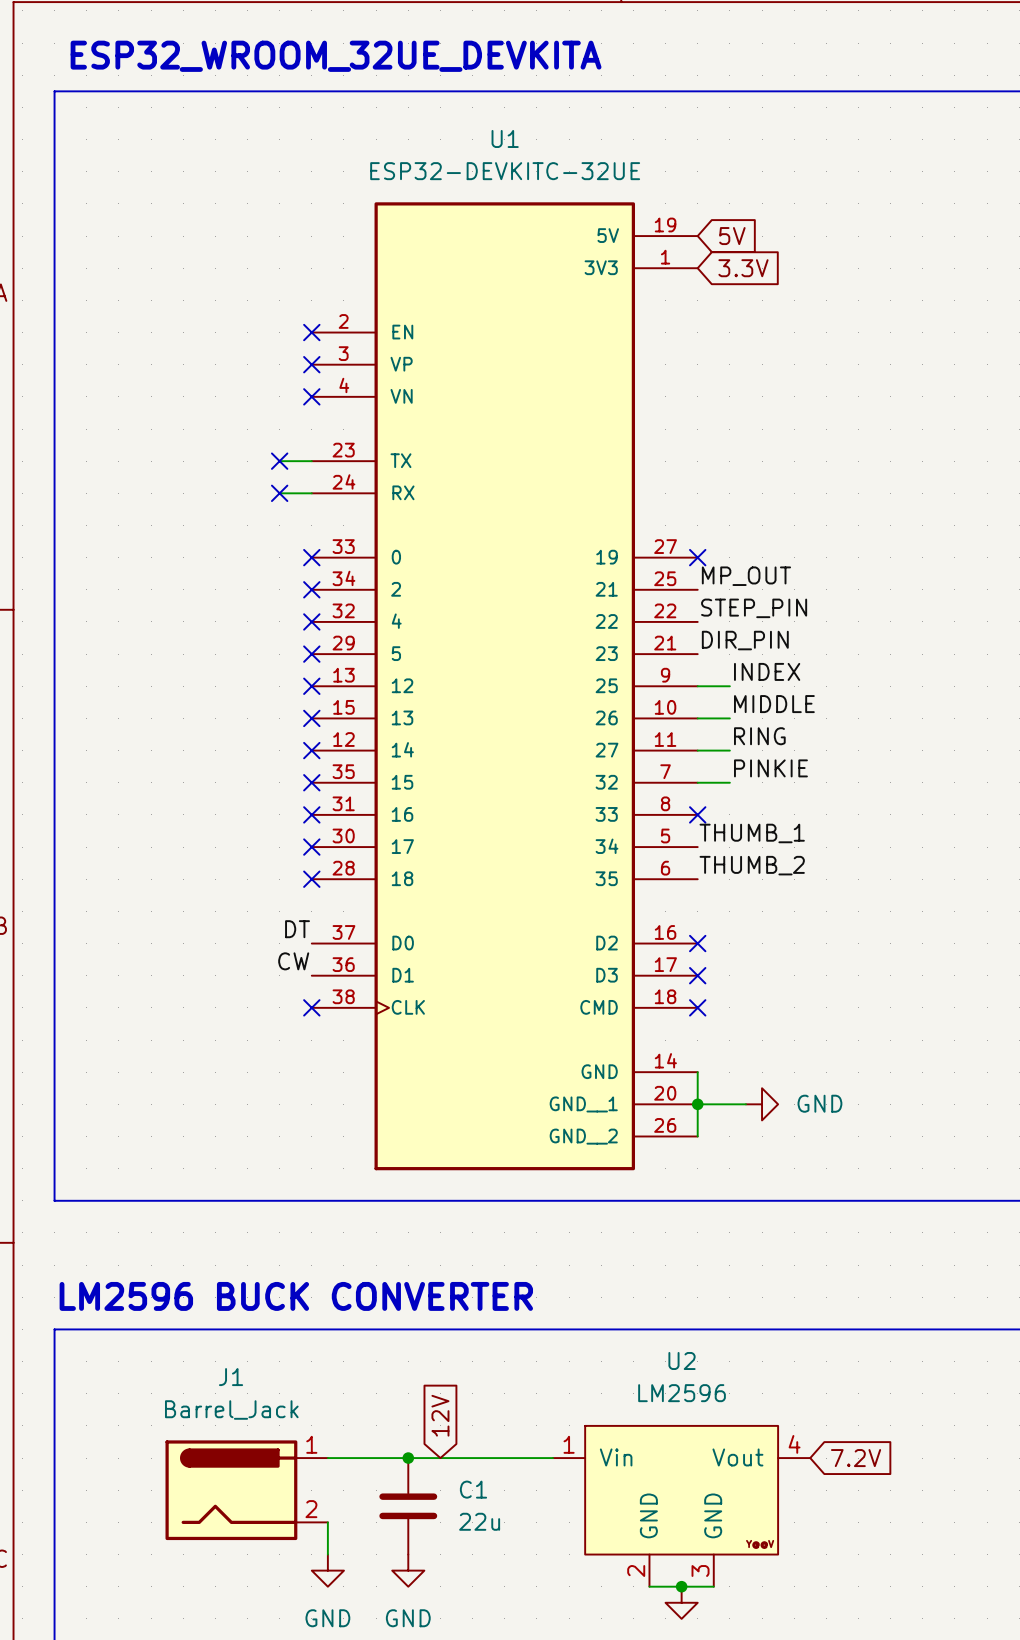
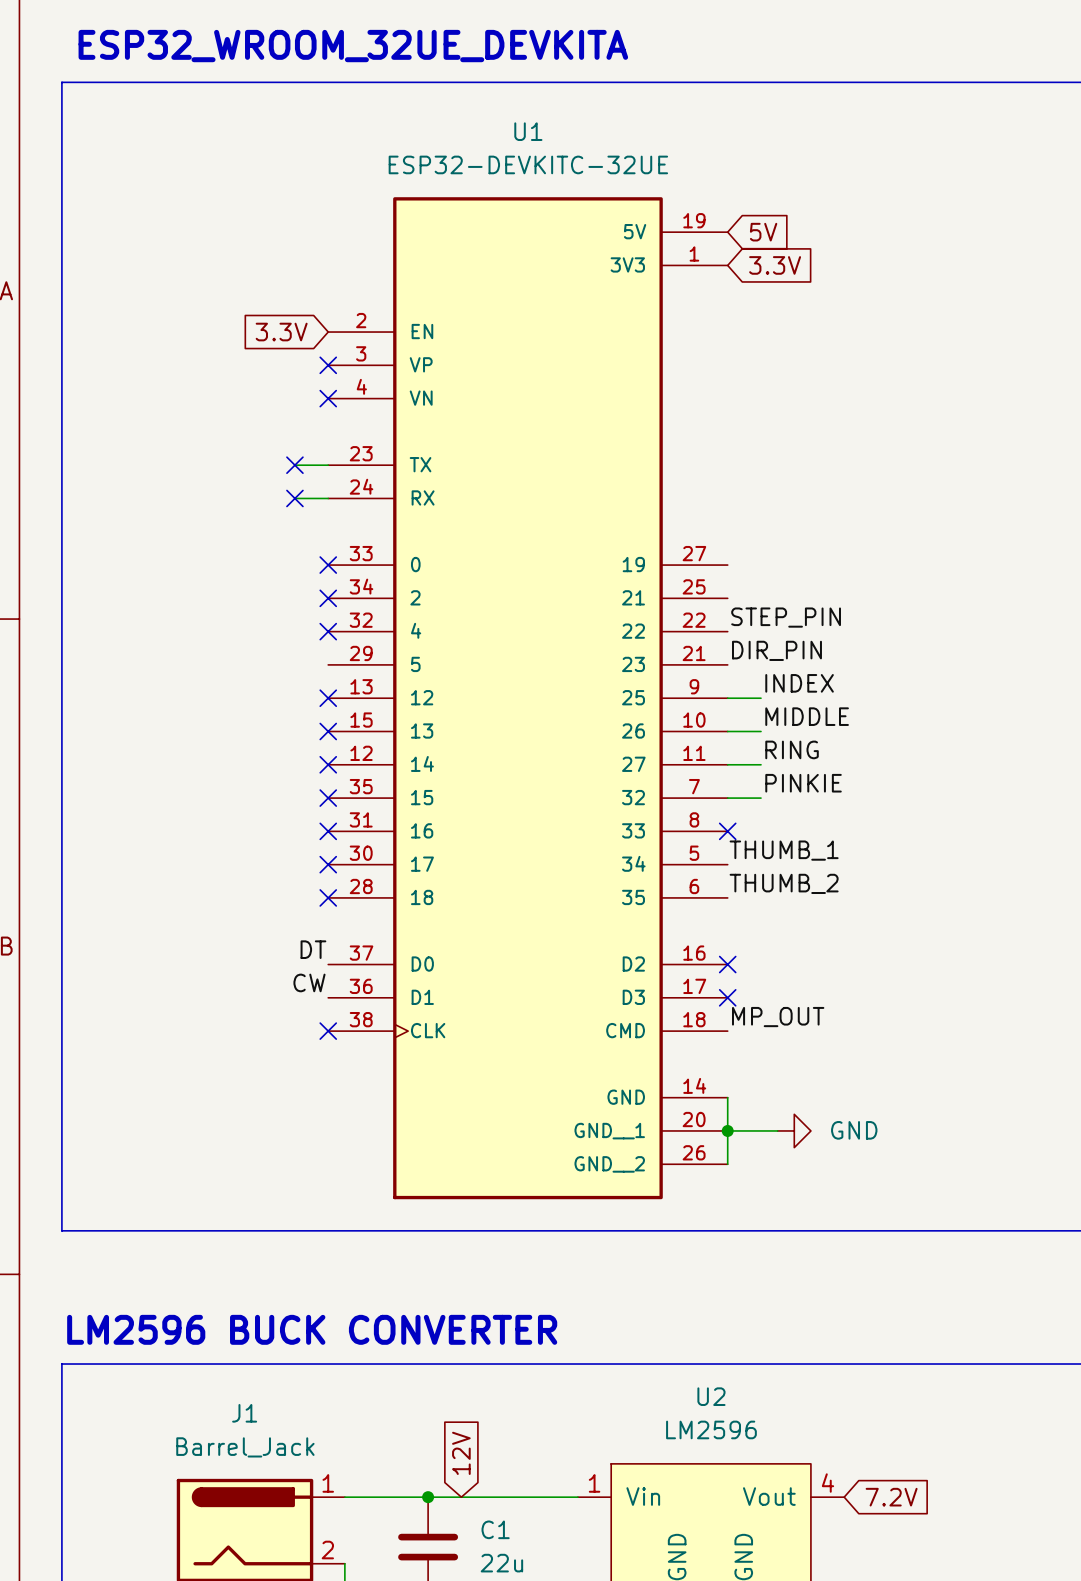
global label: none -> 3.3V (281, 332)
no-connect mark: (311, 332) -> none
no-connect mark: (697, 557) -> none
label: MP_OUT (746, 576) -> none
no-connect mark: (311, 654) -> none
label: none -> MP_OUT (778, 1017)
no-connect mark: (697, 1007) -> none

